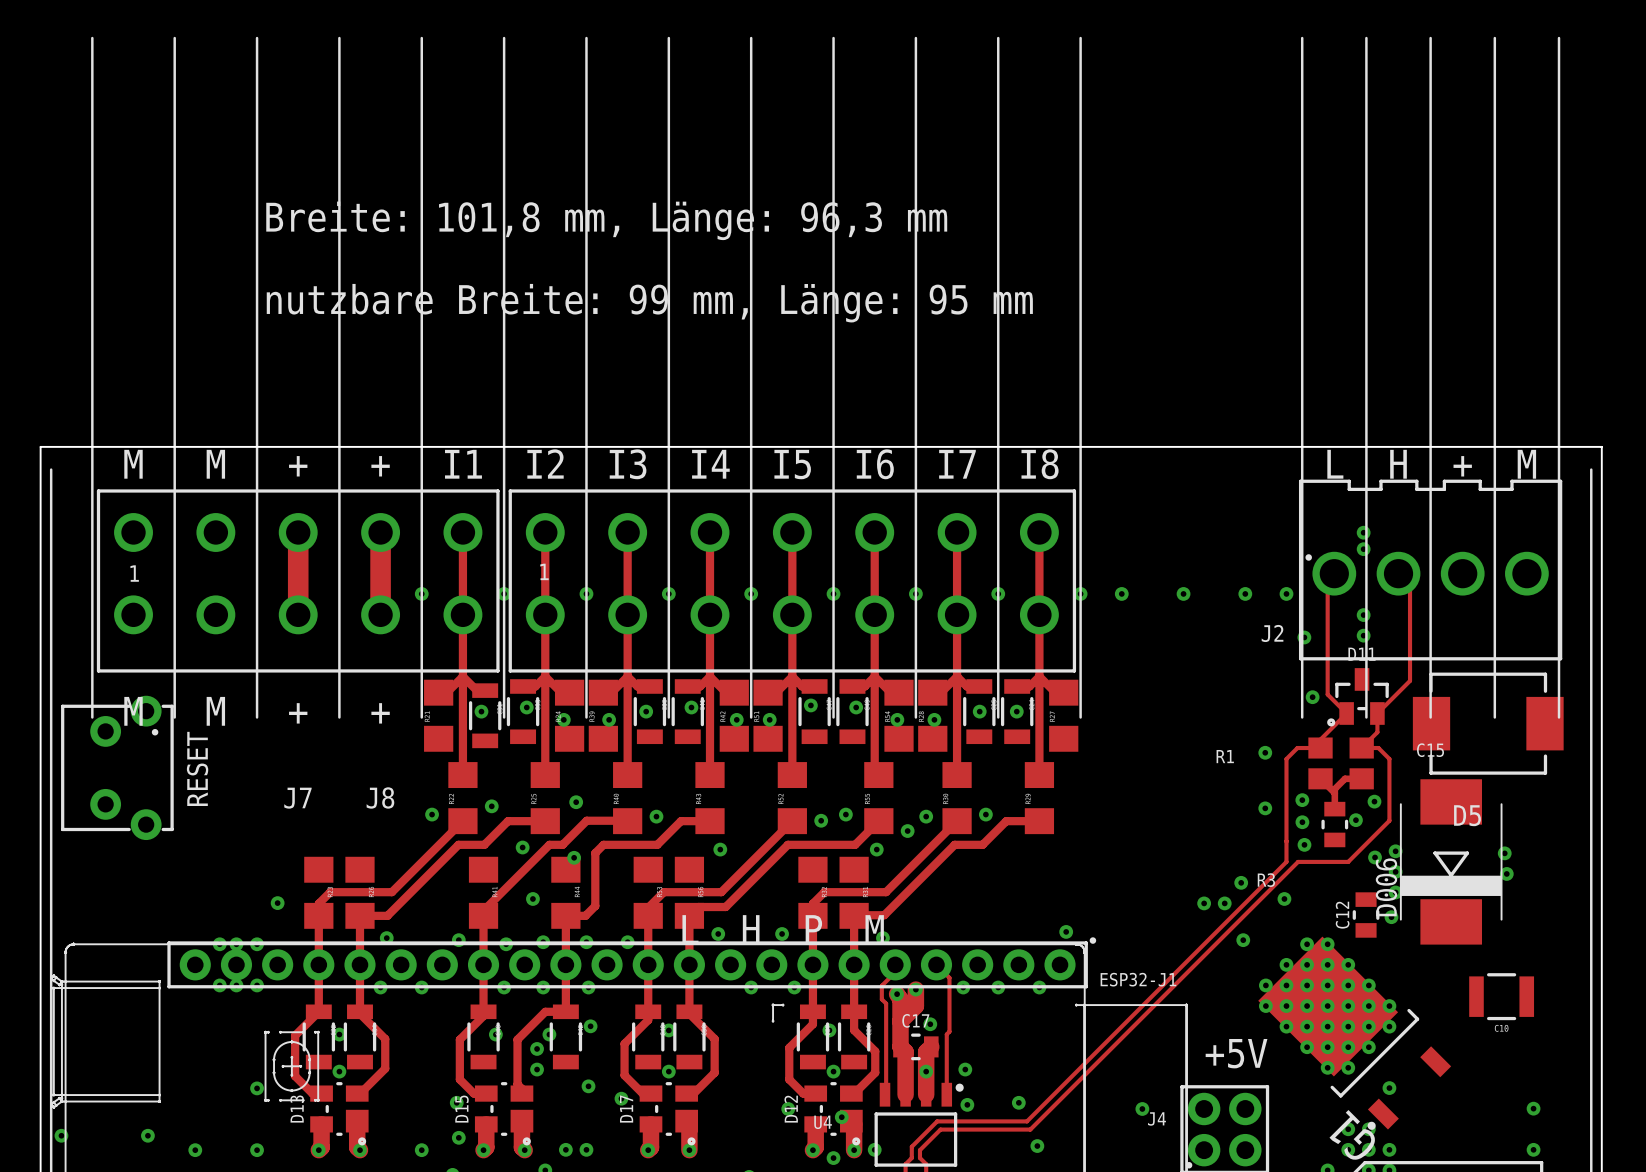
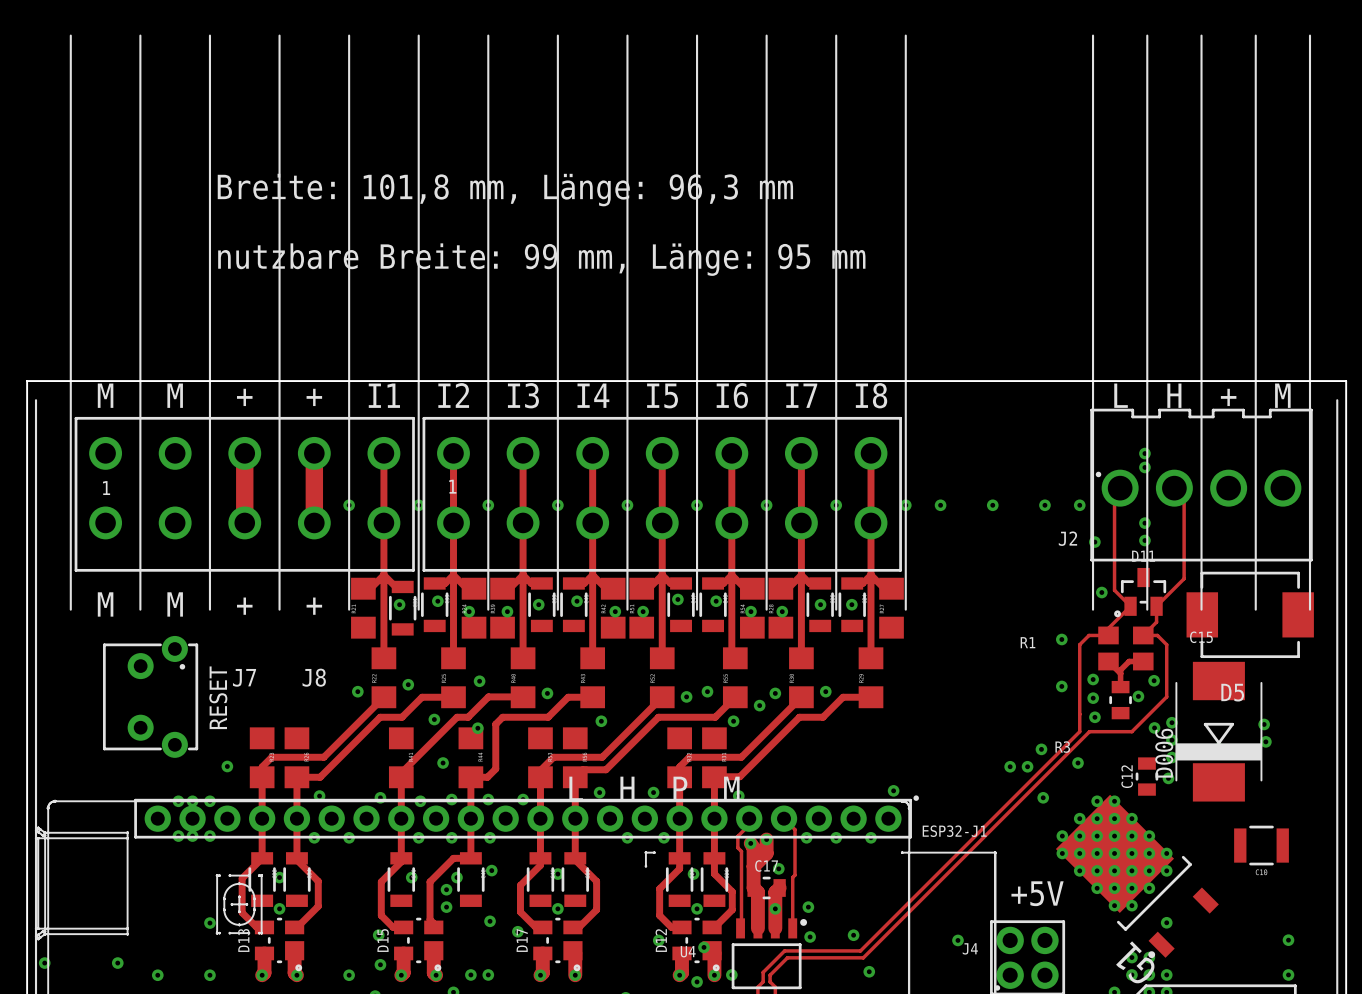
RESET position: (117, 767) -> (150, 696)

